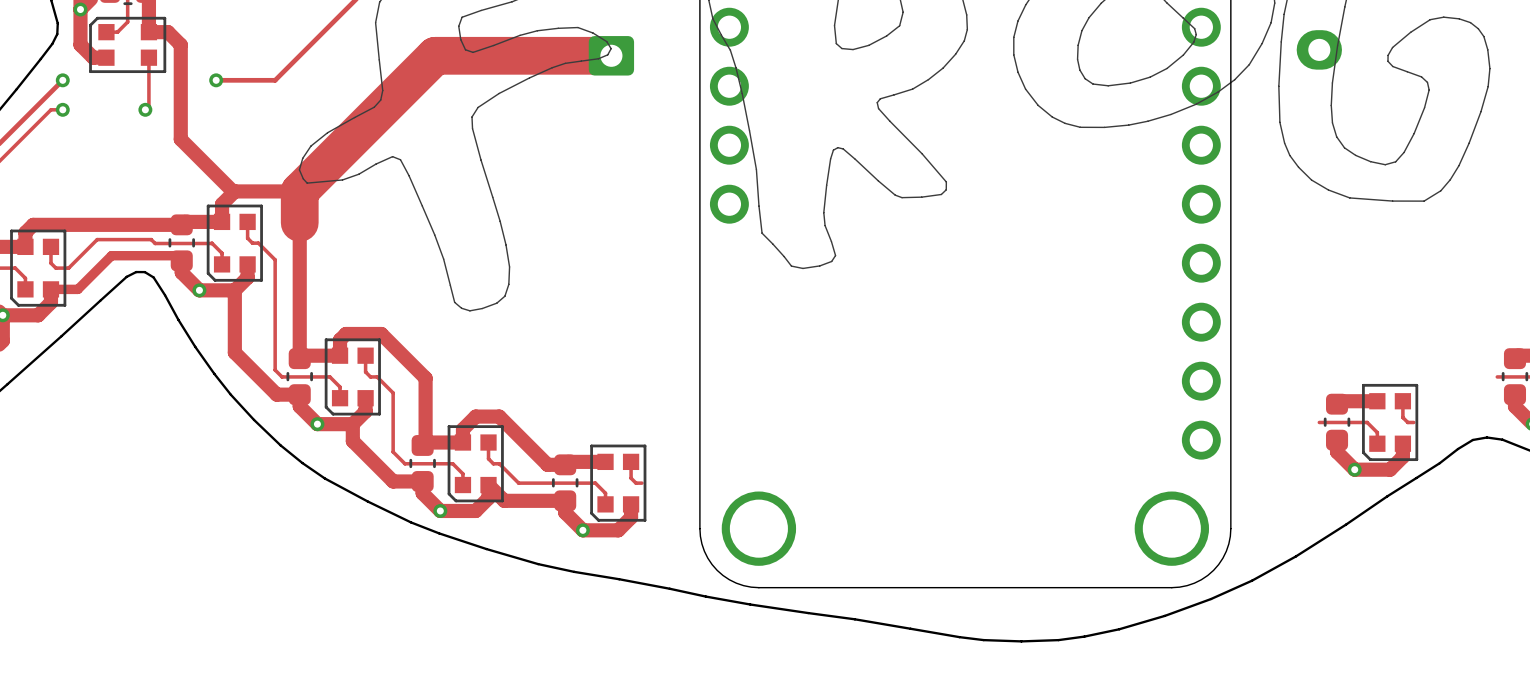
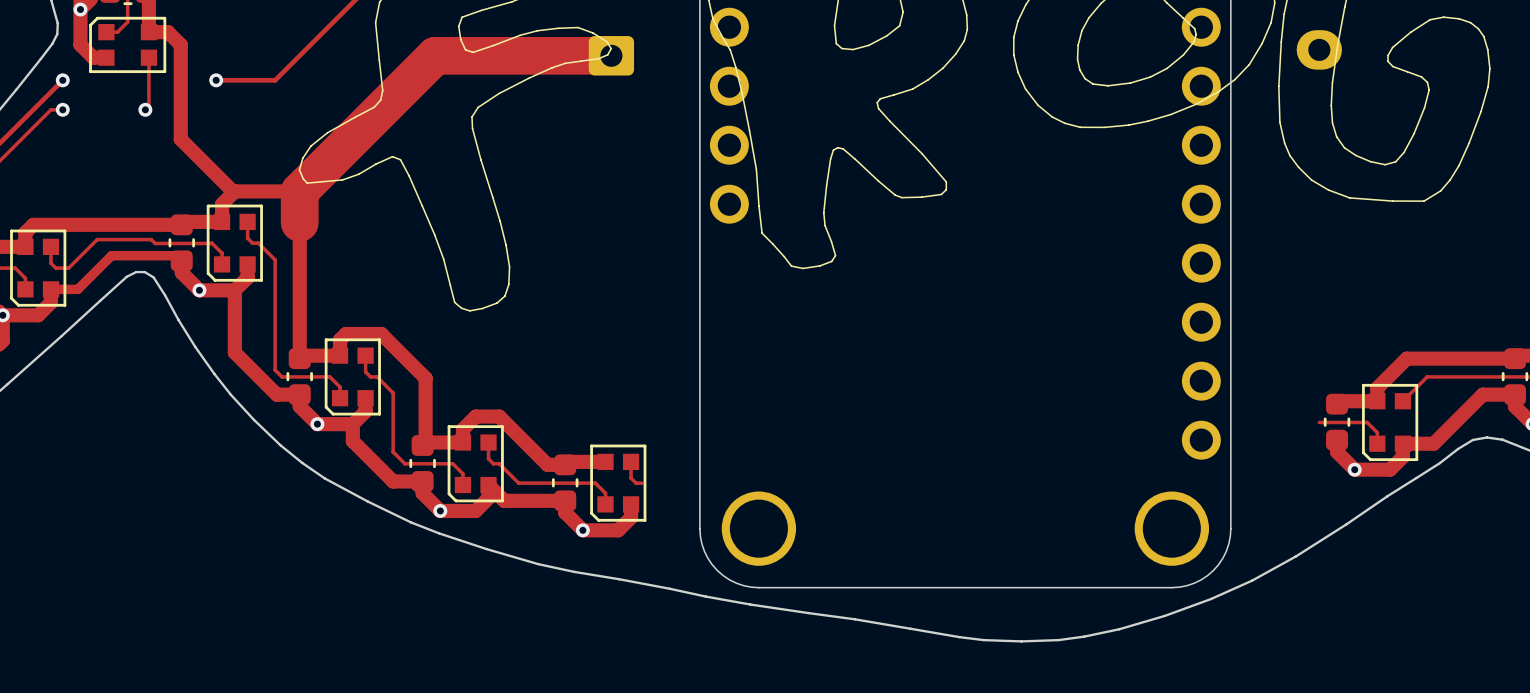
track: none -> (1514, 358) (1406, 358) (1377, 388) (1377, 401)
track: none -> (1514, 394) (1482, 394) (1433, 443) (1402, 443)
track: (1402, 401) (1402, 417) (1407, 422) (1413, 422) -> (1402, 401) (1427, 376) (1497, 376)

